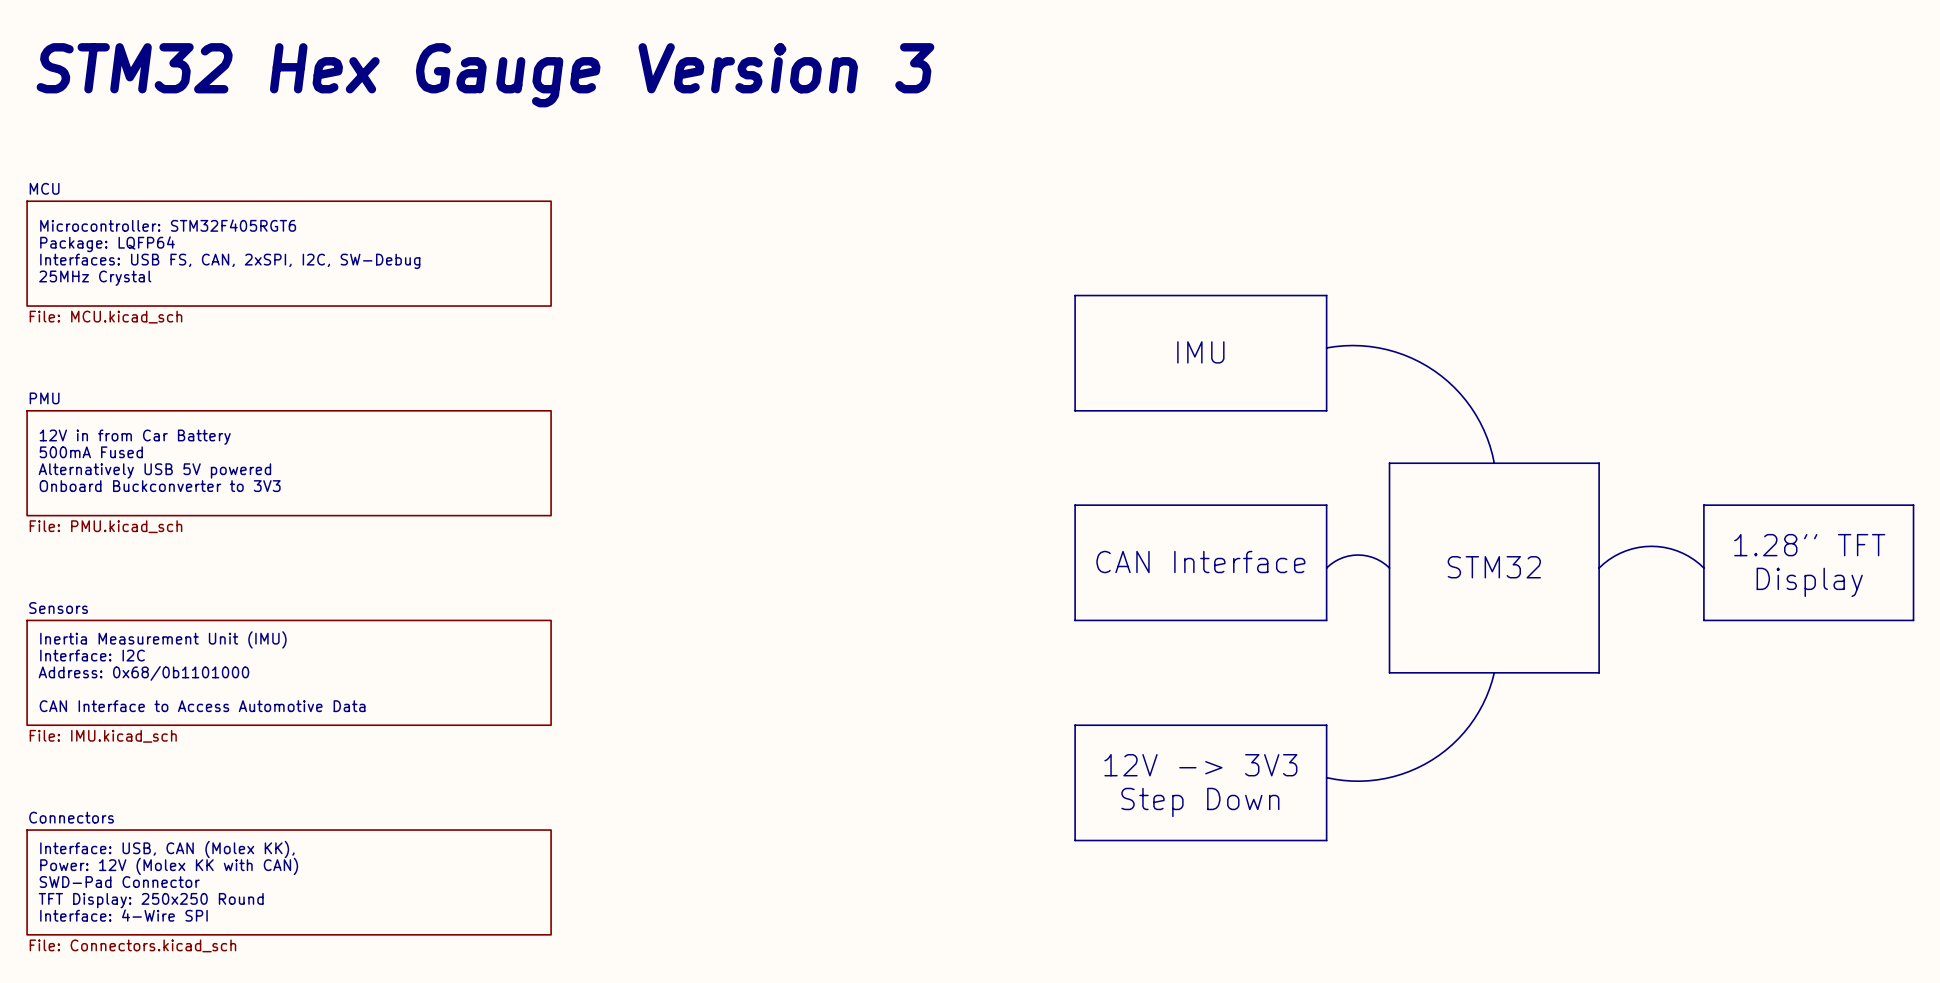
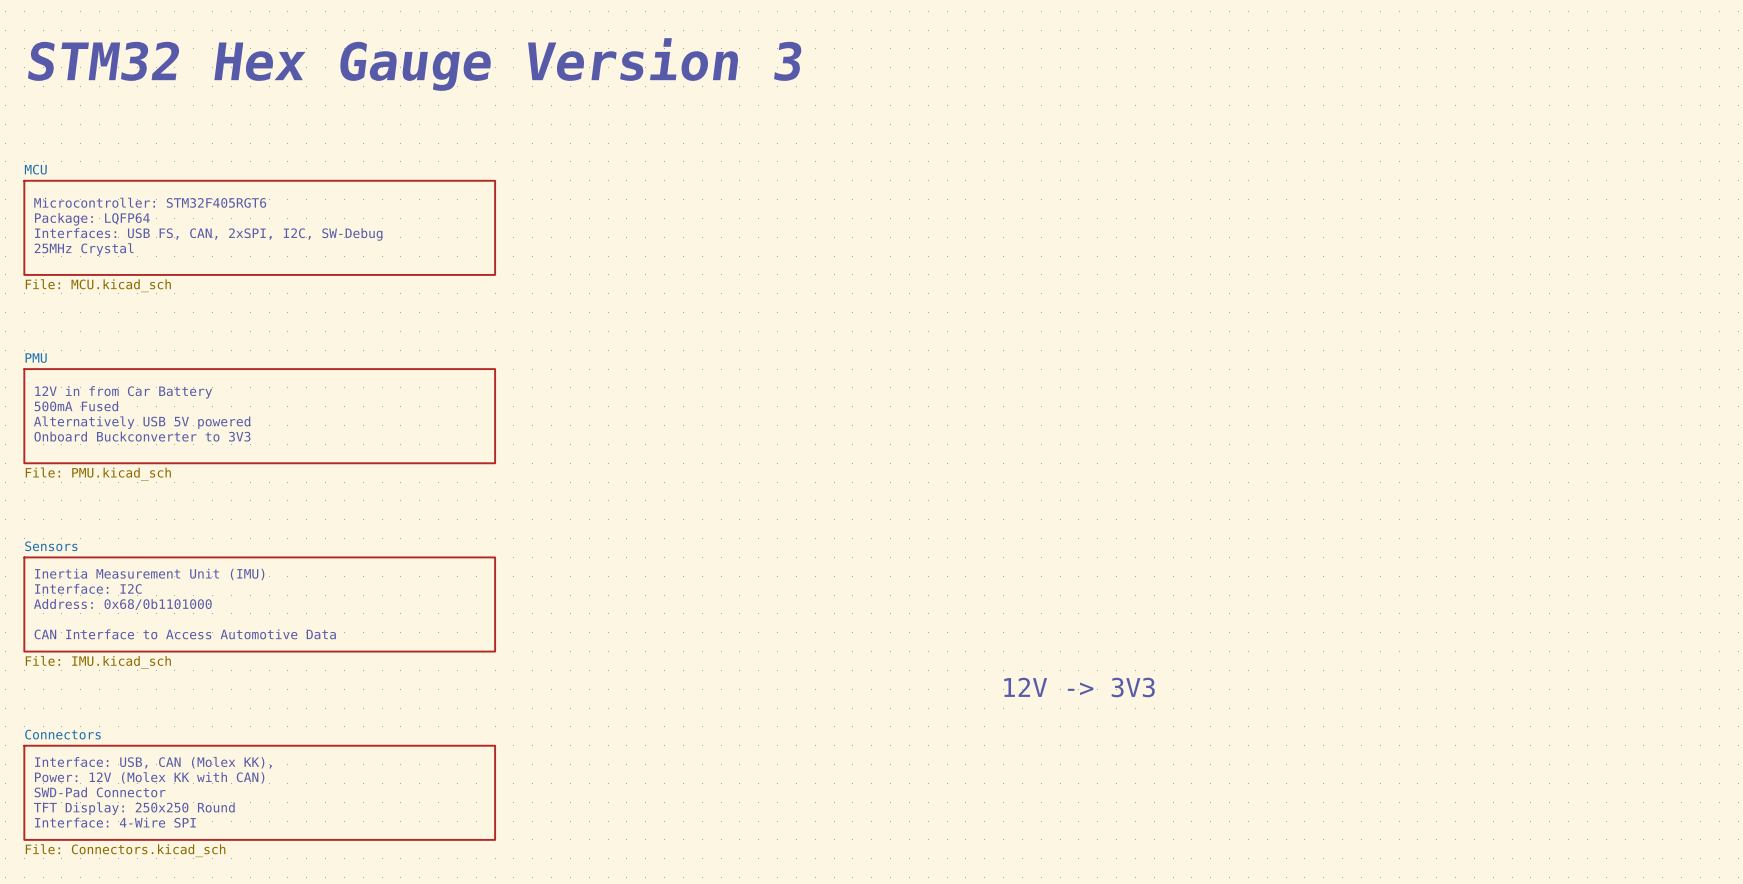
line: (1075, 295) (1326, 295) (1326, 410) (1075, 410) (1075, 295) -> none
line: (1326, 347) (1352, 345) (1378, 347) (1411, 358) (1434, 370) (1454, 387) (1471, 407) (1483, 430) (1494, 463) -> none
text: IMU (1200, 352) -> none
line: (1389, 463) (1599, 463) (1599, 672) (1389, 672) (1389, 463) -> none
line: (1075, 505) (1075, 620) (1326, 620) (1326, 505) (1075, 505) -> none
line: (1703, 505) (1913, 505) (1913, 620) (1703, 620) (1703, 505) -> none
text: 1.28'' TFT (1809, 545) -> none
text: CAN Interface (1200, 562) -> none
text: STM32 (1494, 567) -> none
line: (1326, 568) (1338, 559) (1358, 555) (1372, 557) (1389, 568) -> none
line: (1599, 568) (1609, 559) (1626, 550) (1651, 546) (1676, 550) (1694, 559) (1703, 568) -> none
text: Display (1809, 582) -> none
line: (1494, 672) (1482, 704) (1469, 725) (1452, 744) (1432, 759) (1401, 774) (1376, 779) (1351, 781) (1326, 777) -> none
line: (1075, 725) (1075, 840) (1326, 840) (1326, 725) (1075, 725) -> none
text: Step Down (1200, 802) -> none

